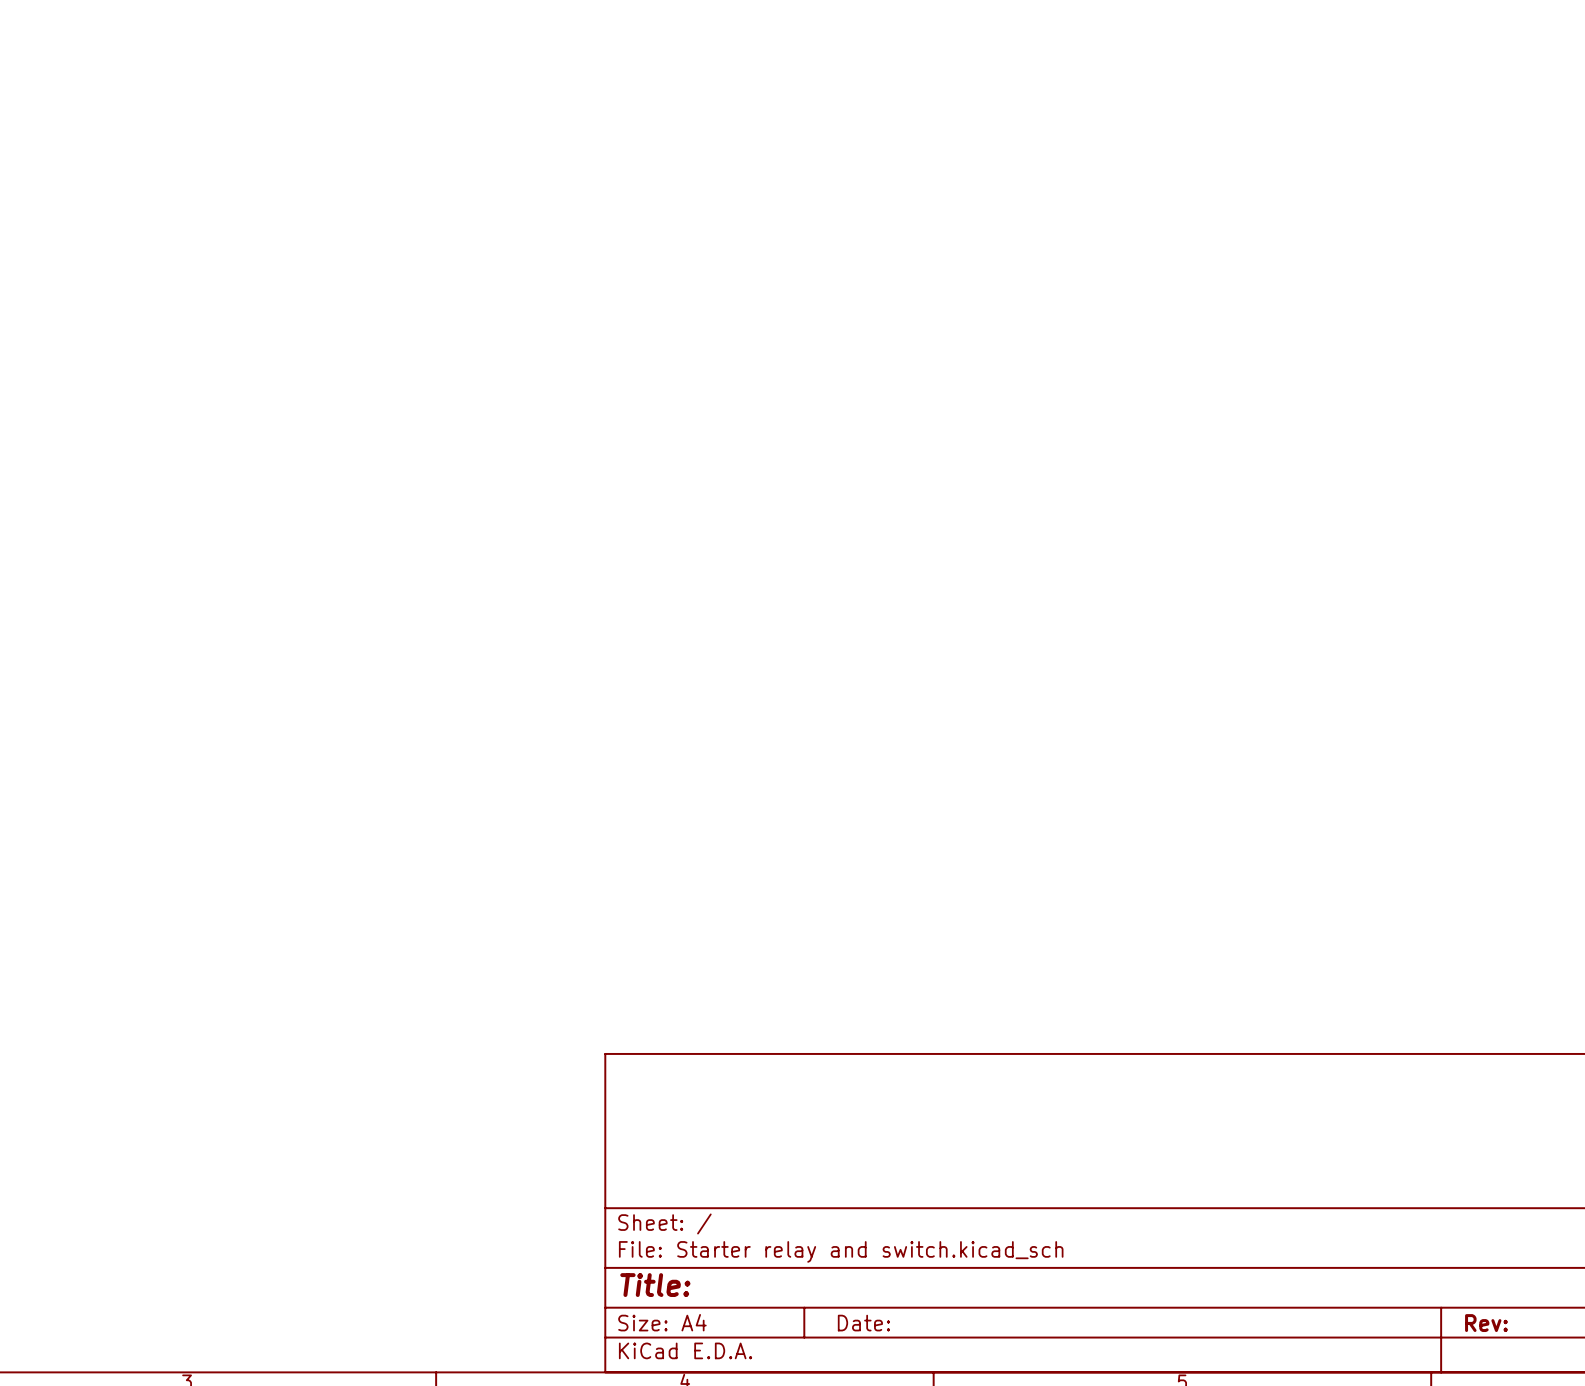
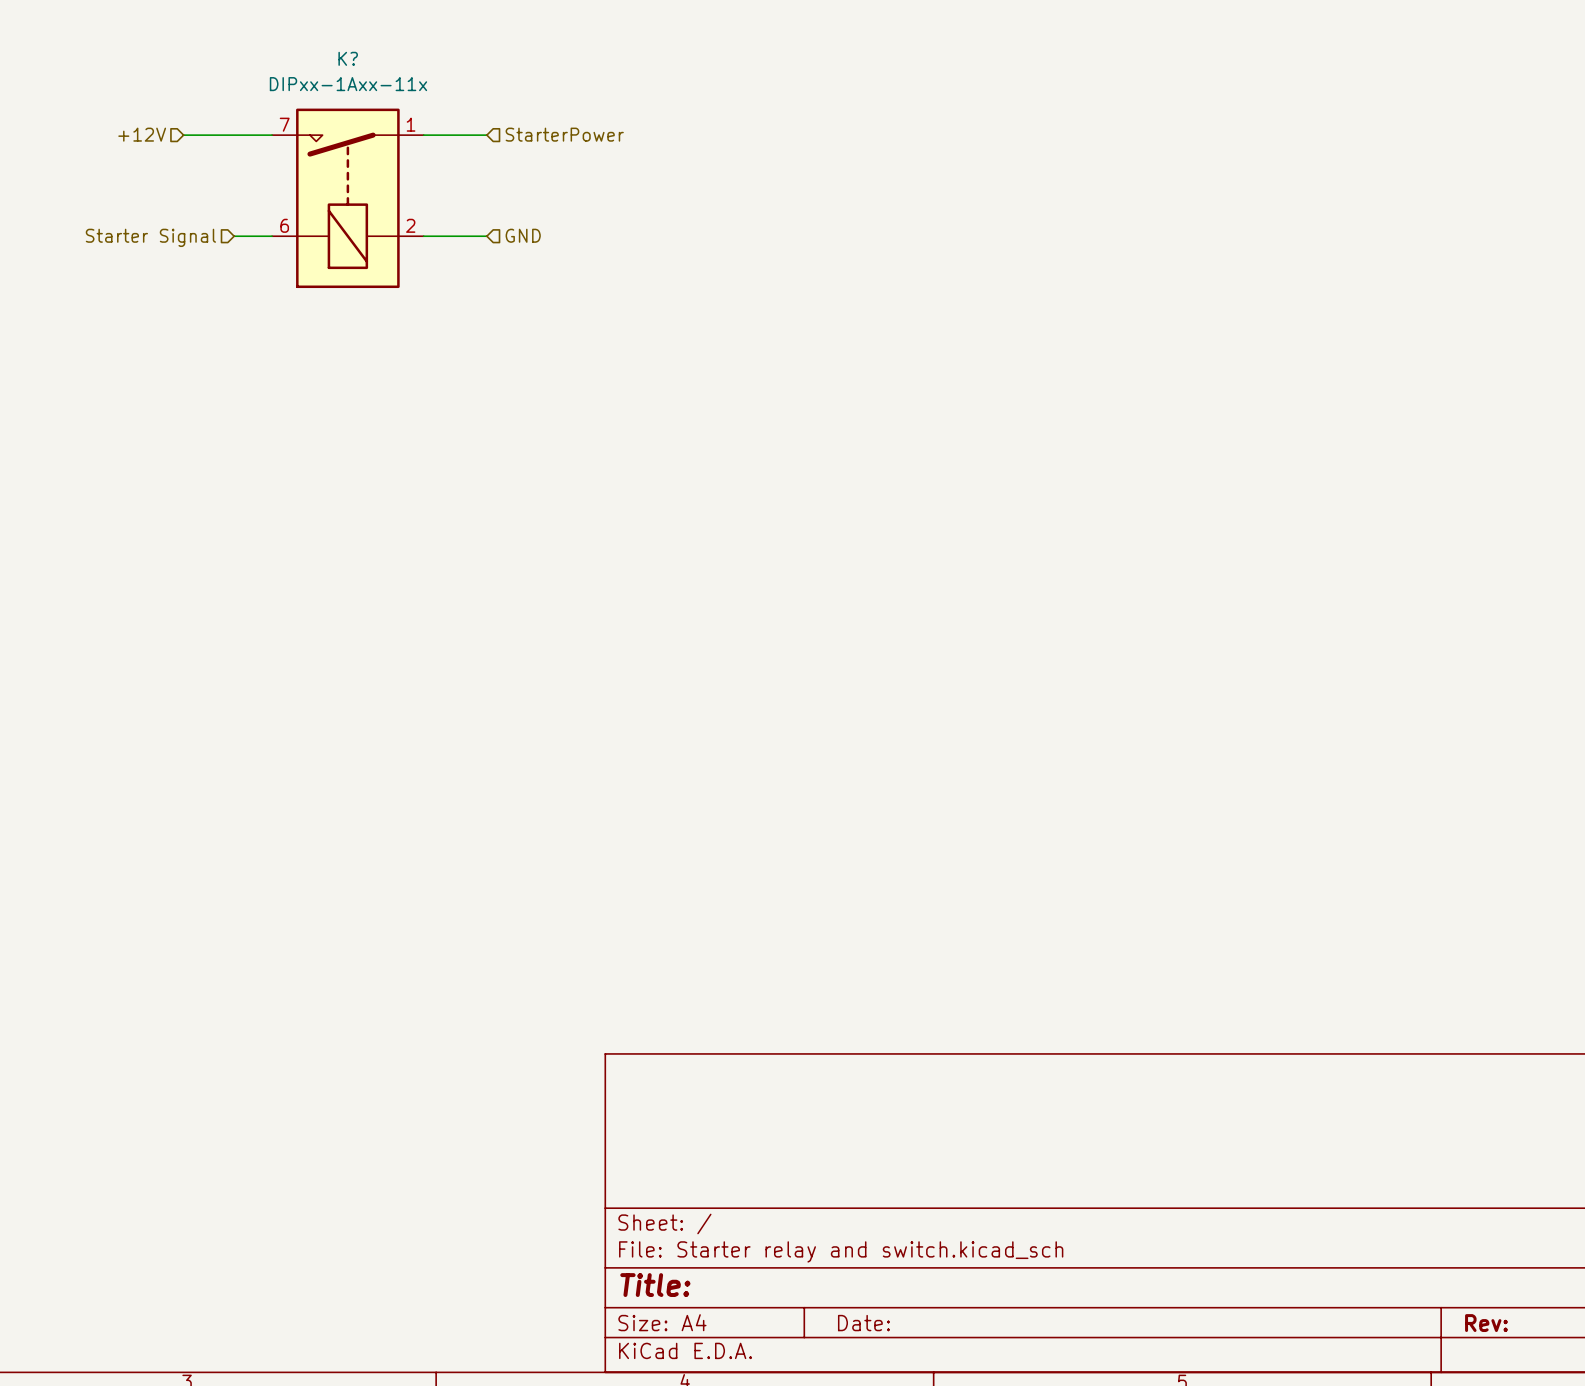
hierarchical label: none -> +12V (142, 134)
hierarchical label: none -> StarterPower (564, 134)
wire: none -> (183, 135) (272, 135)
wire: none -> (423, 135) (486, 135)
K?: none -> DIPxx-1Axx-11x (347, 198)
hierarchical label: none -> GND (523, 235)
wire: none -> (234, 236) (272, 236)
wire: none -> (423, 236) (486, 236)
hierarchical label: none -> Starter Signal (150, 237)

